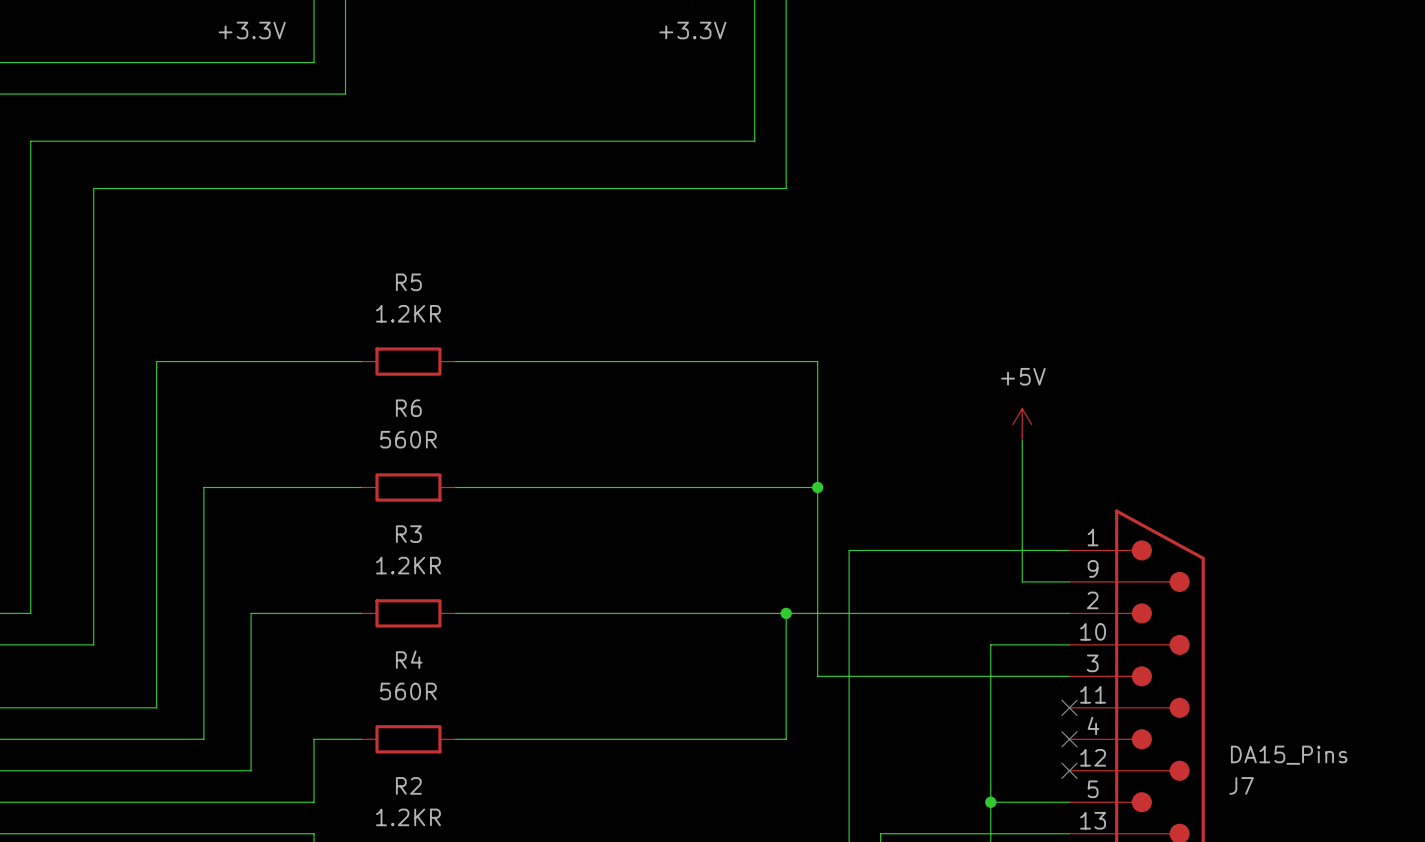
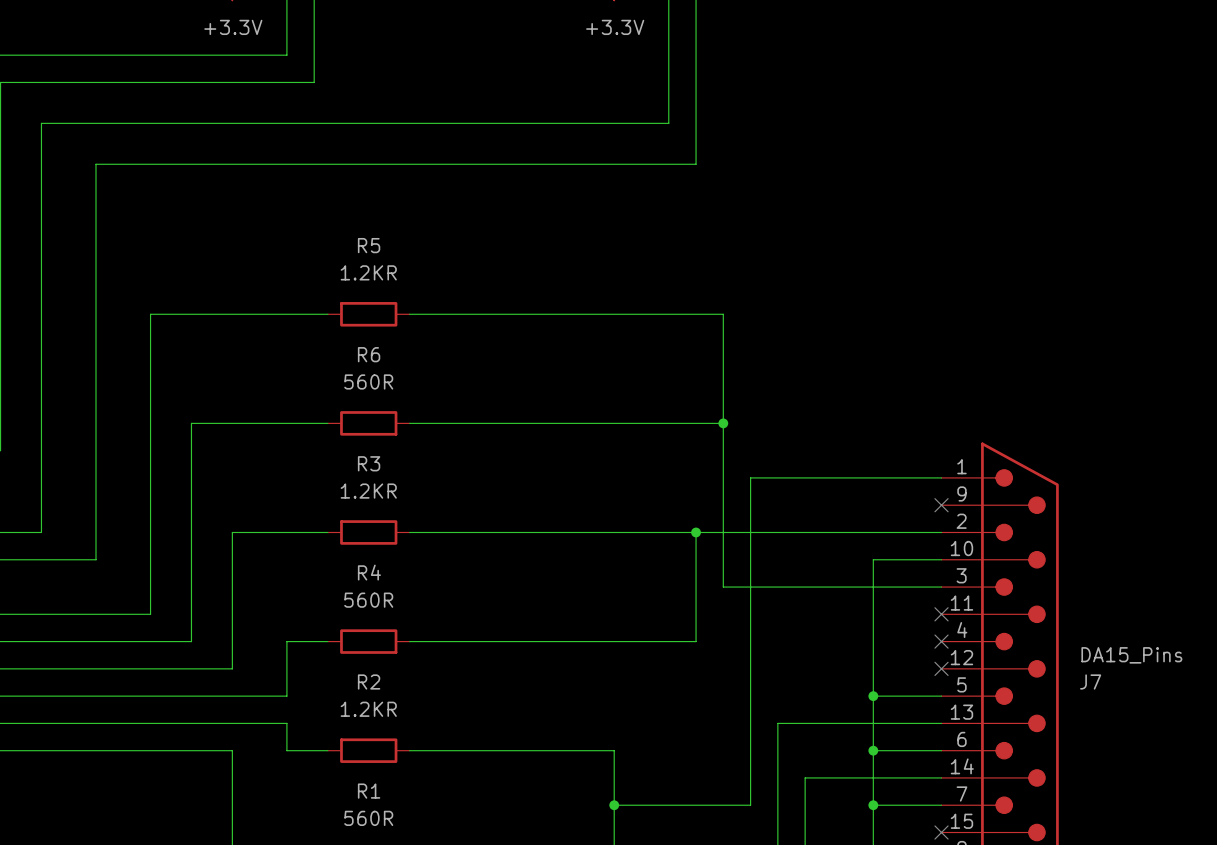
power symbol: +5V (1022, 424) -> none
wire: (1022, 440) (1022, 581) (1069, 581) -> none
no-connect mark: none -> (941, 505)

